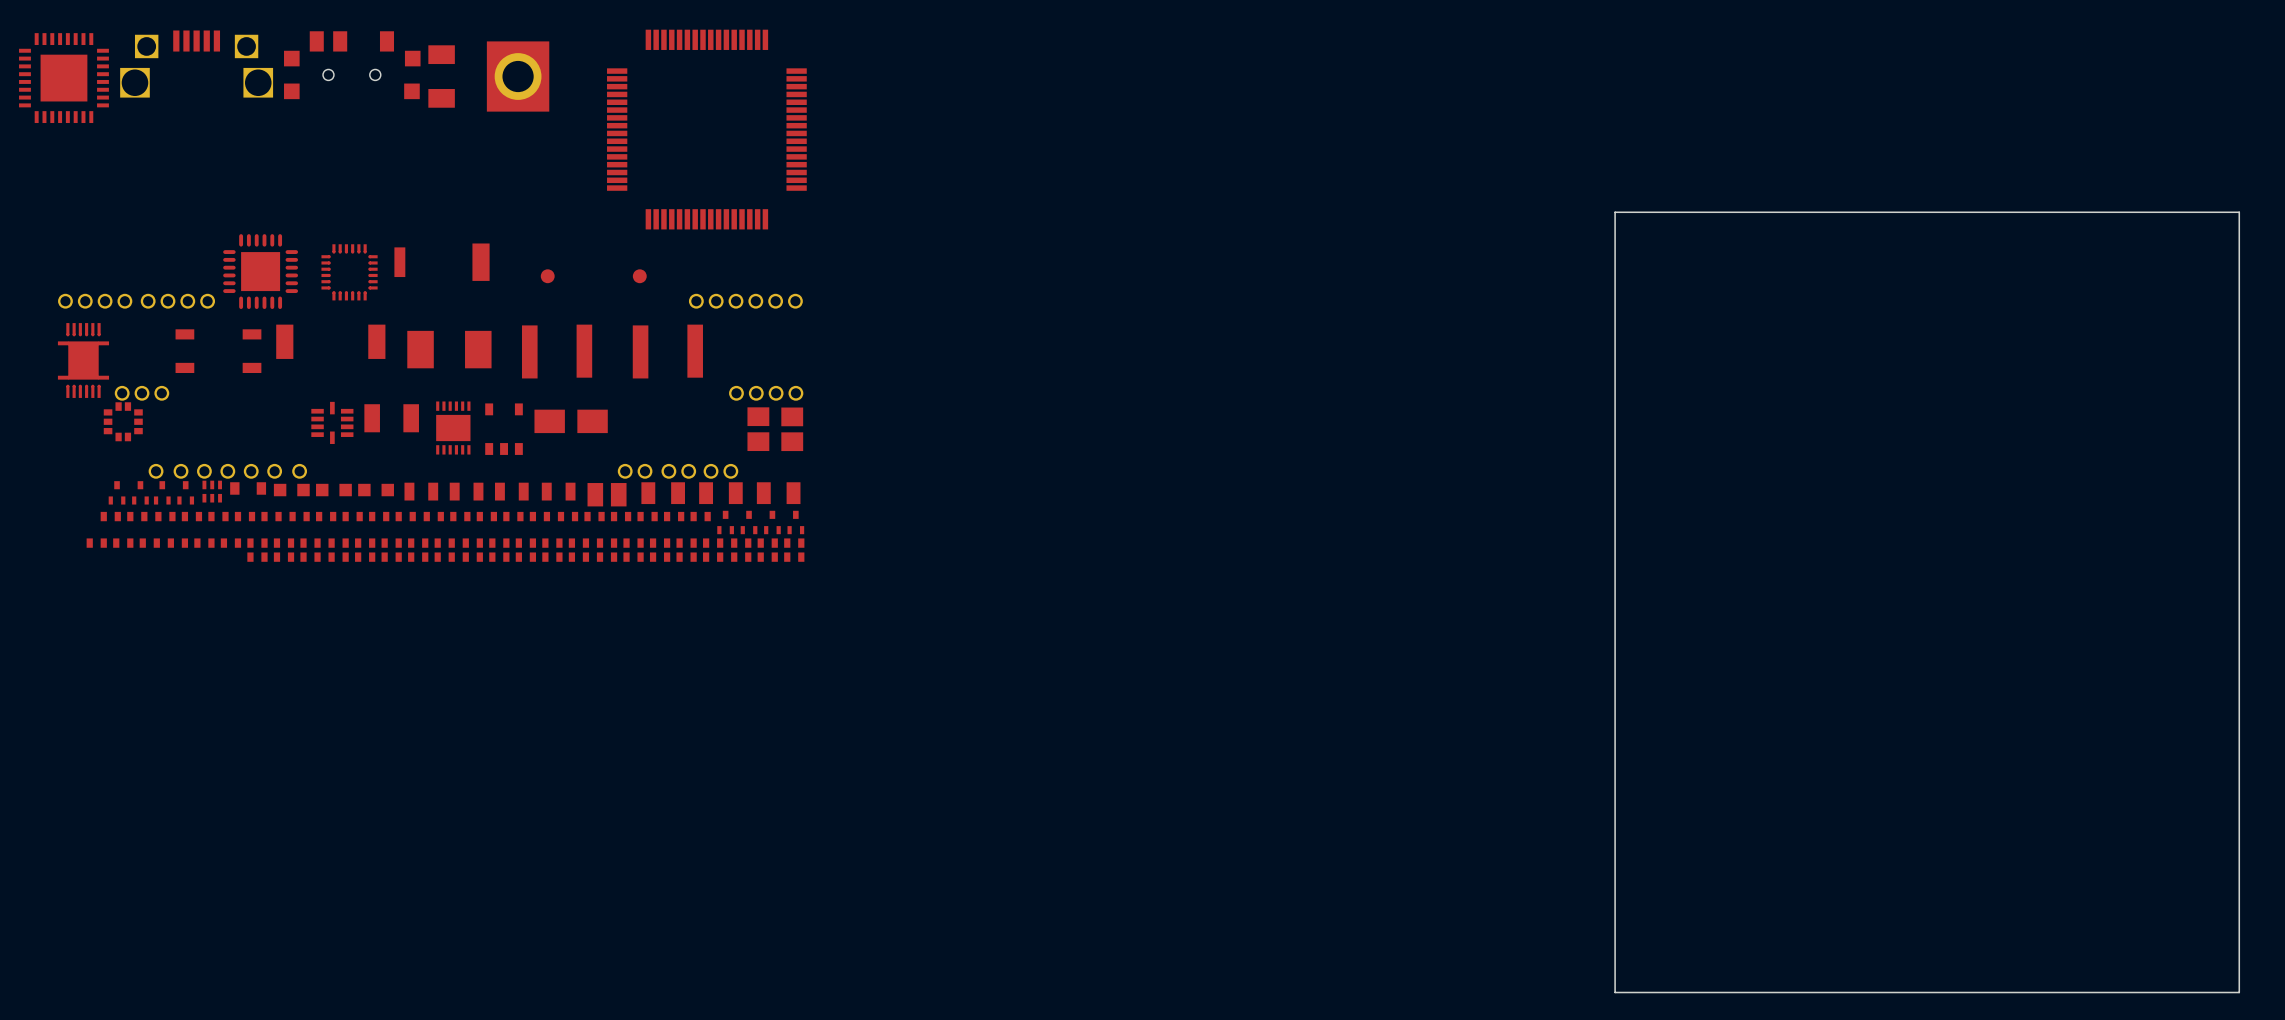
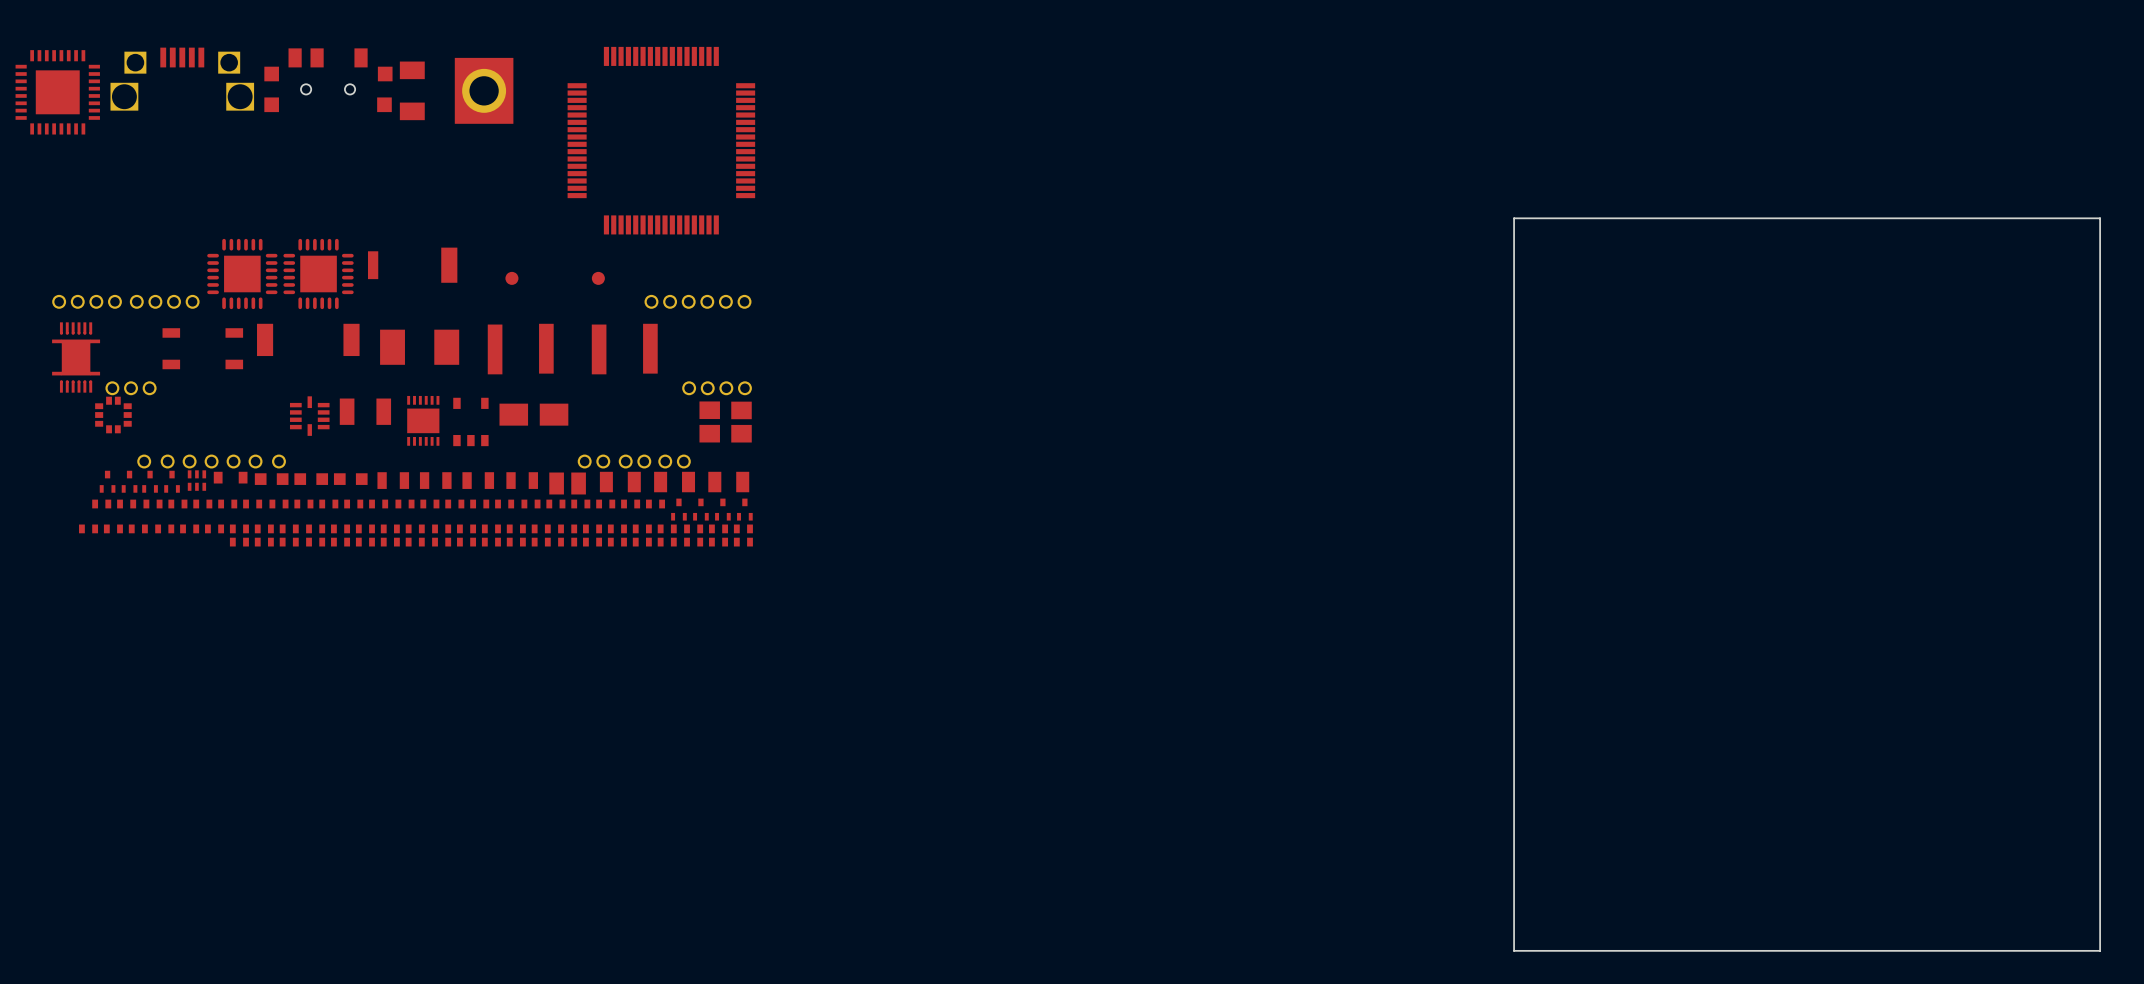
part footprint: [321, 244, 378, 301] -> [283, 238, 354, 310]

